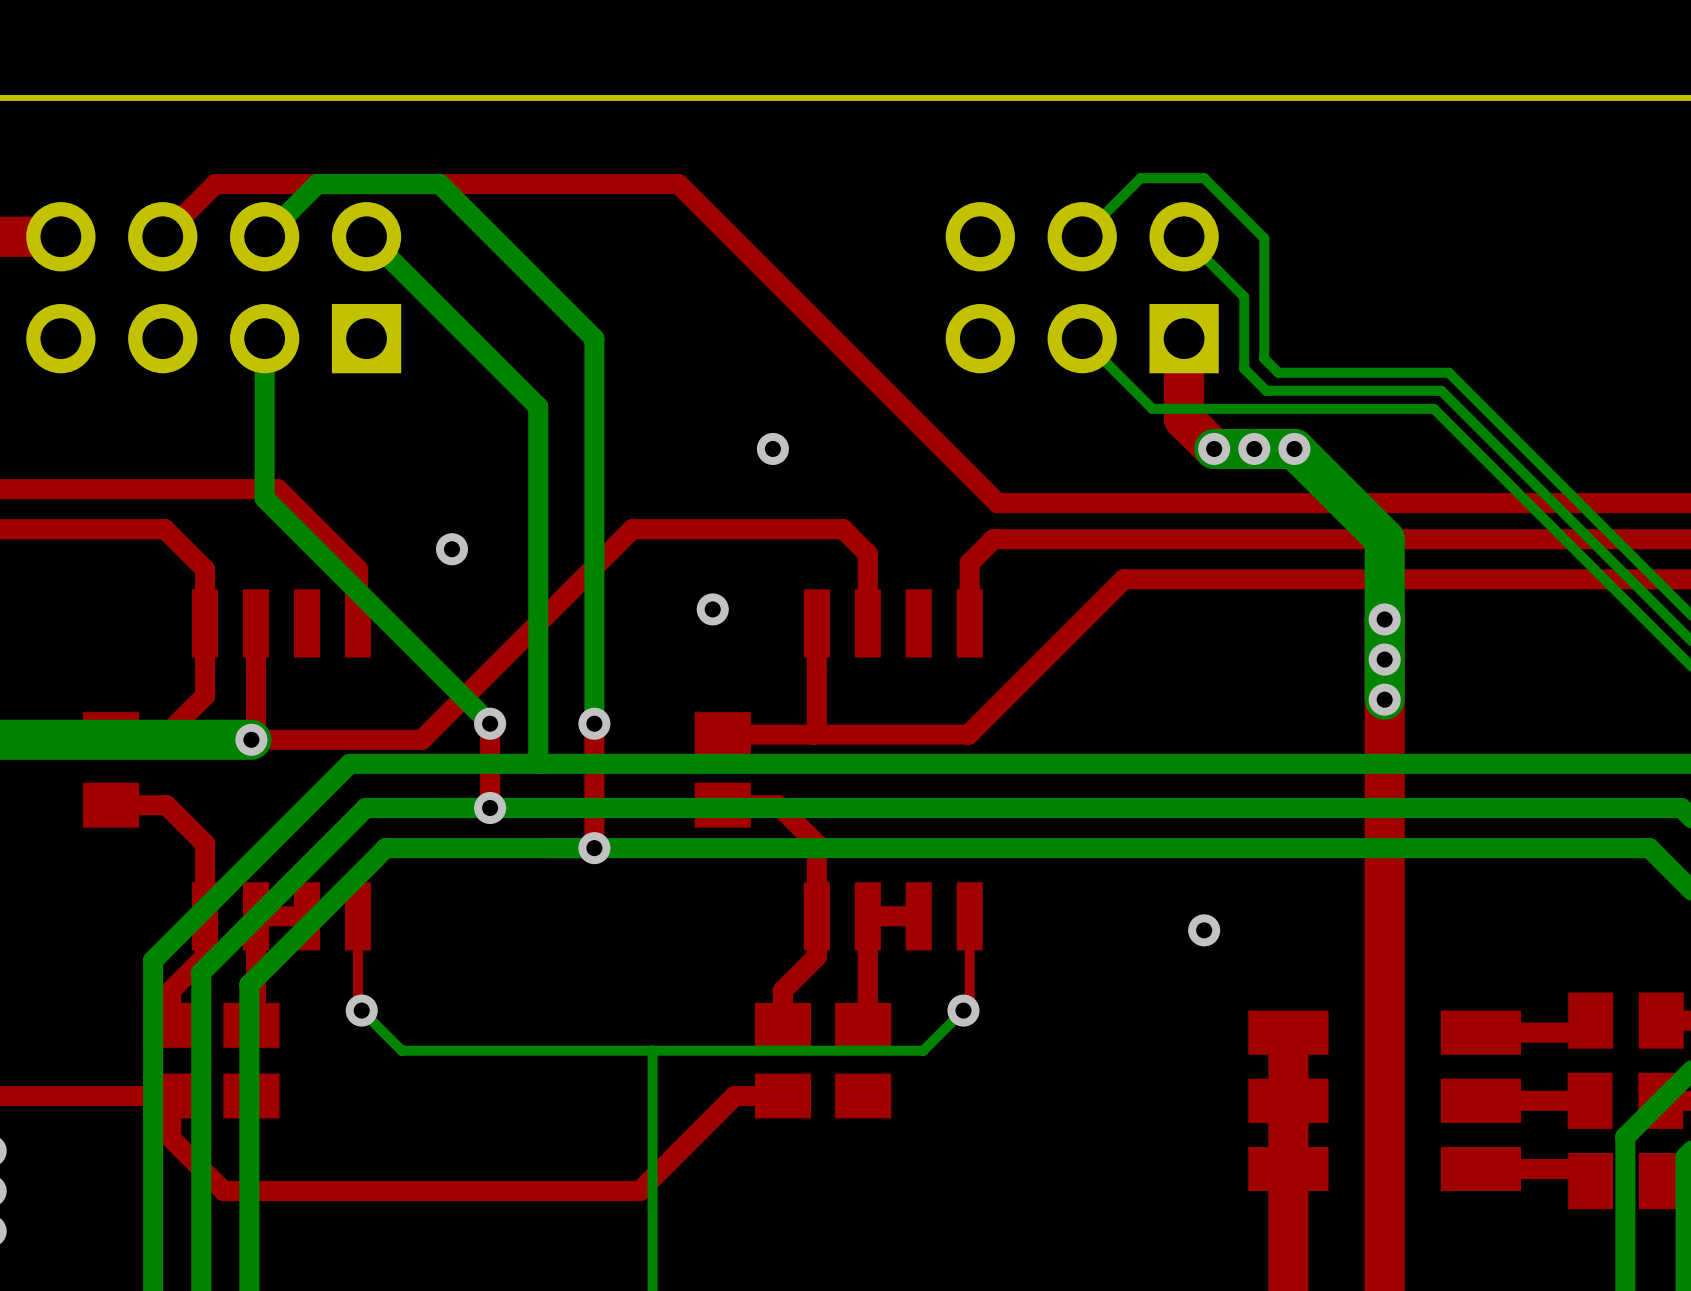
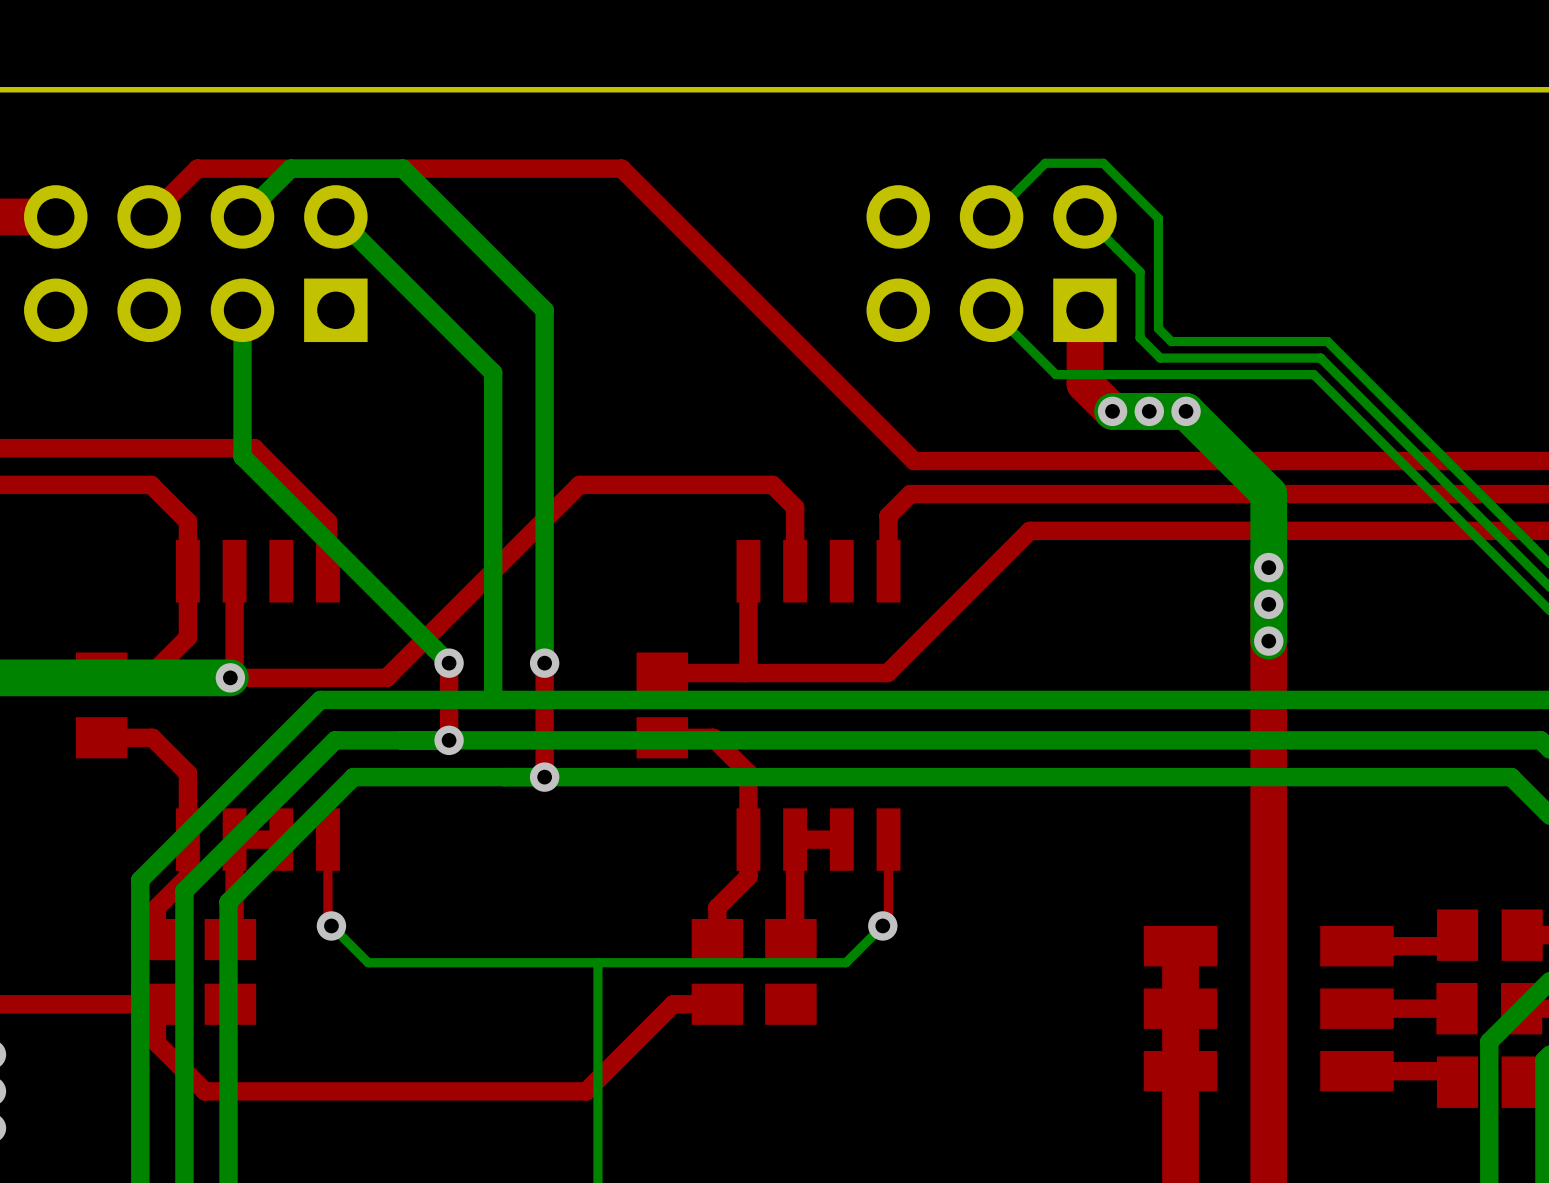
via: (772, 448) -> none
via: (451, 549) -> none
via: (712, 609) -> none
via: (1204, 930) -> none

